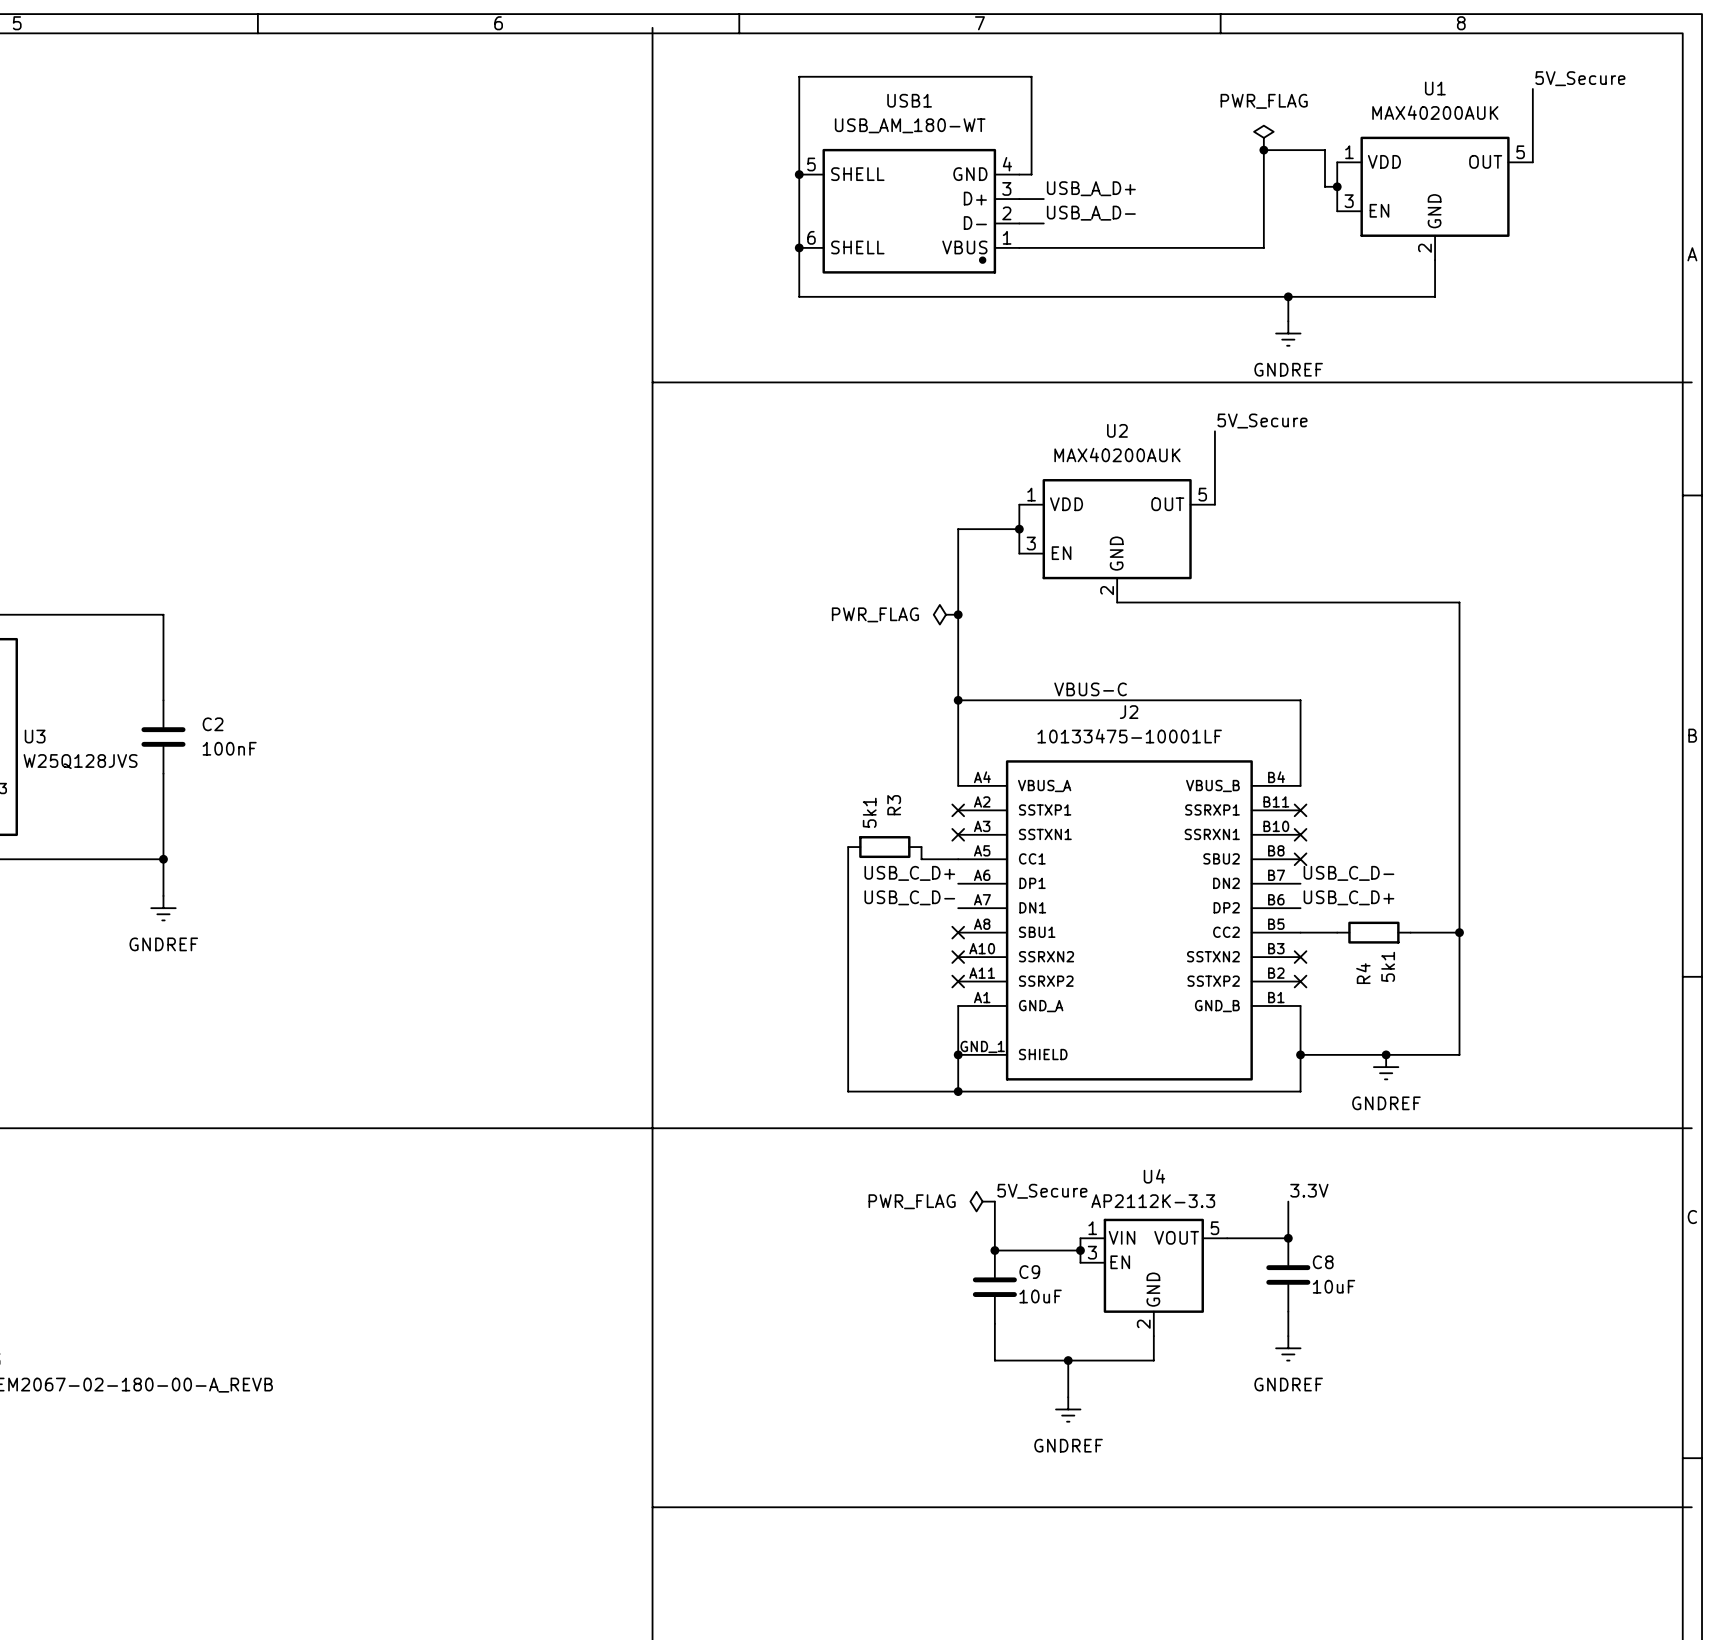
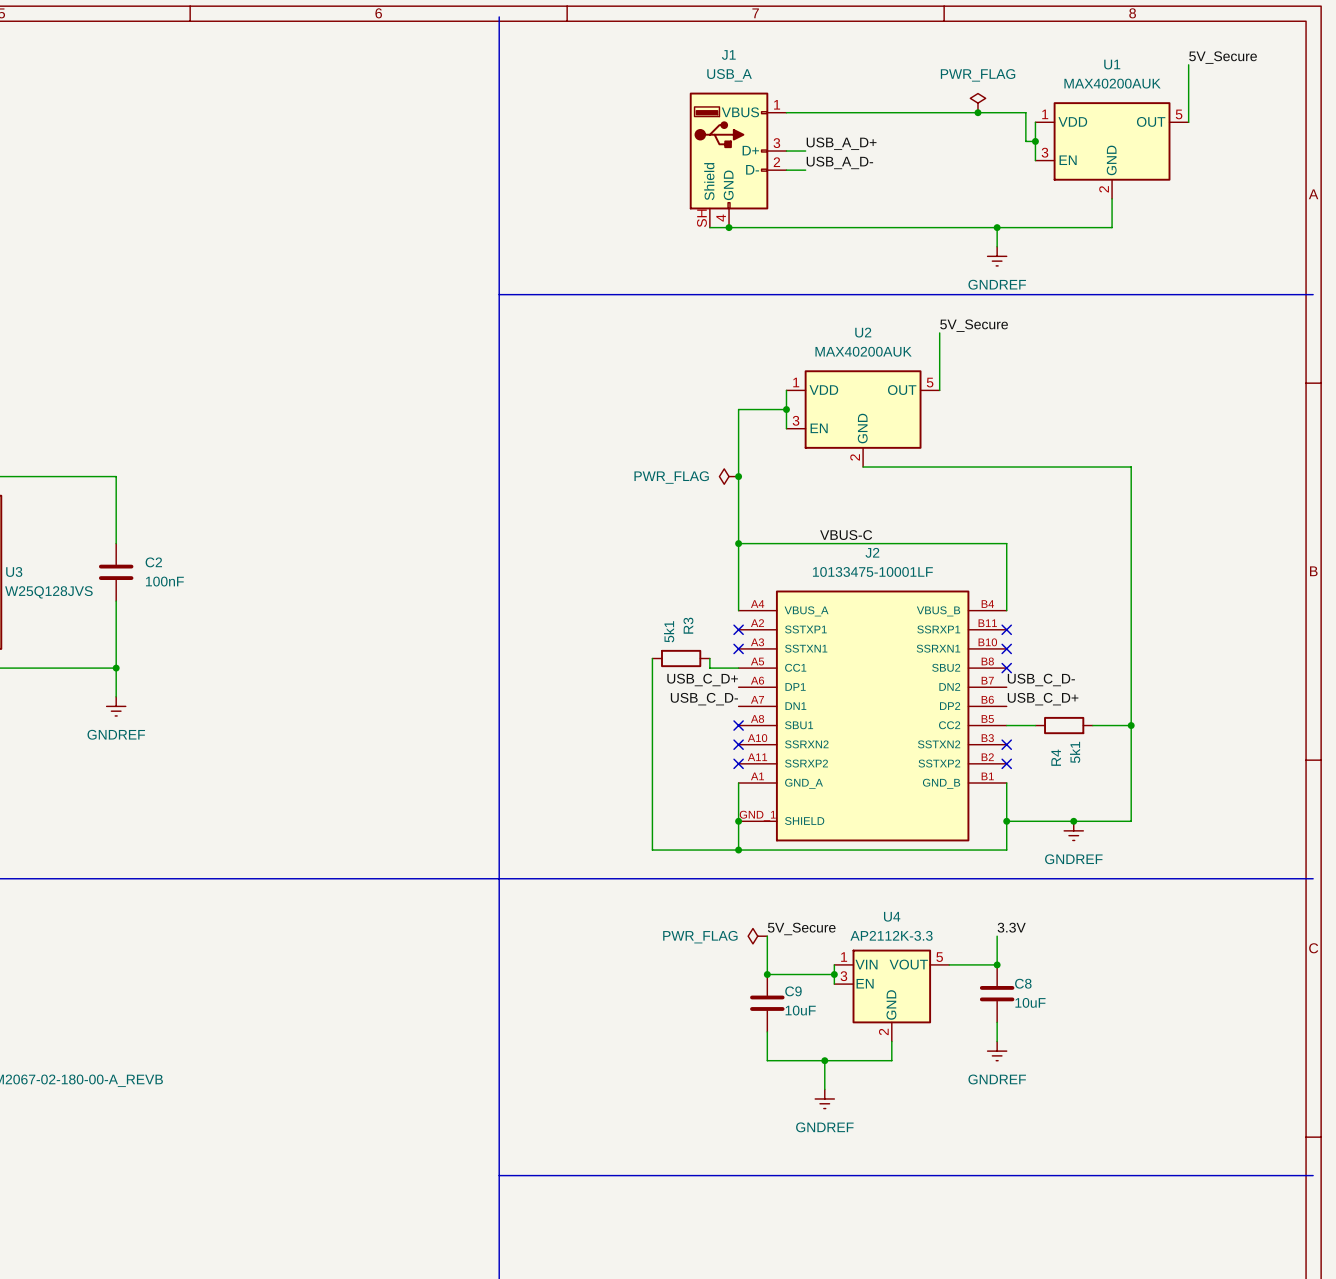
wire: (1263, 150) (1263, 247) (1019, 247) -> (977, 112) (786, 112)
junction: (799, 174) -> none
wire: (1019, 174) (1031, 174) (1031, 76) (799, 76) (799, 296) (921, 296) -> none
J1: none -> USB_A (738, 160)
USB1: USB_AM_180-WT (909, 211) -> none
junction: (799, 247) -> none
junction: none -> (729, 227)

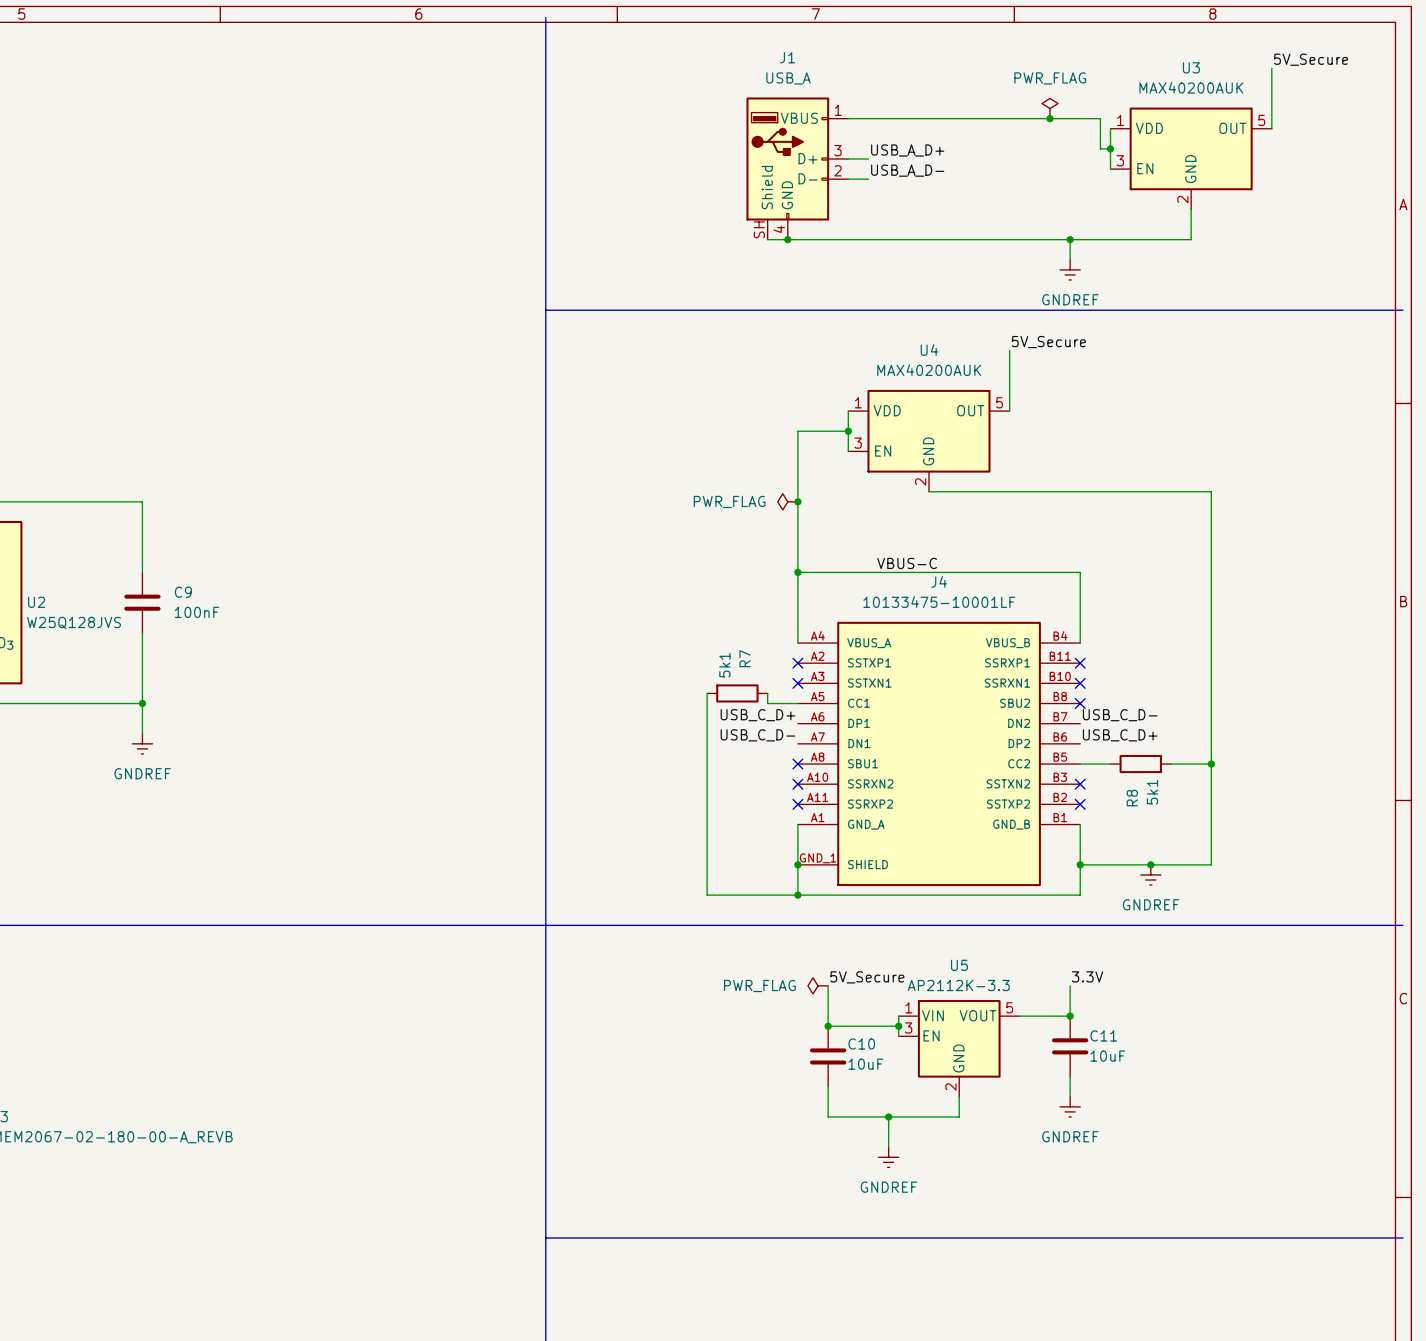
U1 name: U1 (1112, 64) -> U3 (1191, 67)
U2 name: U2 (863, 332) -> U4 (929, 349)
J2 name: J2 (872, 552) -> J4 (939, 581)
C2 name: C2 (153, 562) -> C9 (183, 592)
U3 name: U3 (14, 571) -> U2 (36, 602)
R3 name: R3 (688, 625) -> R7 (745, 658)
R4 name: R4 (1056, 757) -> R8 (1132, 798)
U4 name: U4 (892, 916) -> U5 (959, 965)
C8 name: C8 (1023, 983) -> C11 (1103, 1035)
C9 name: C9 (793, 991) -> C10 (861, 1043)

